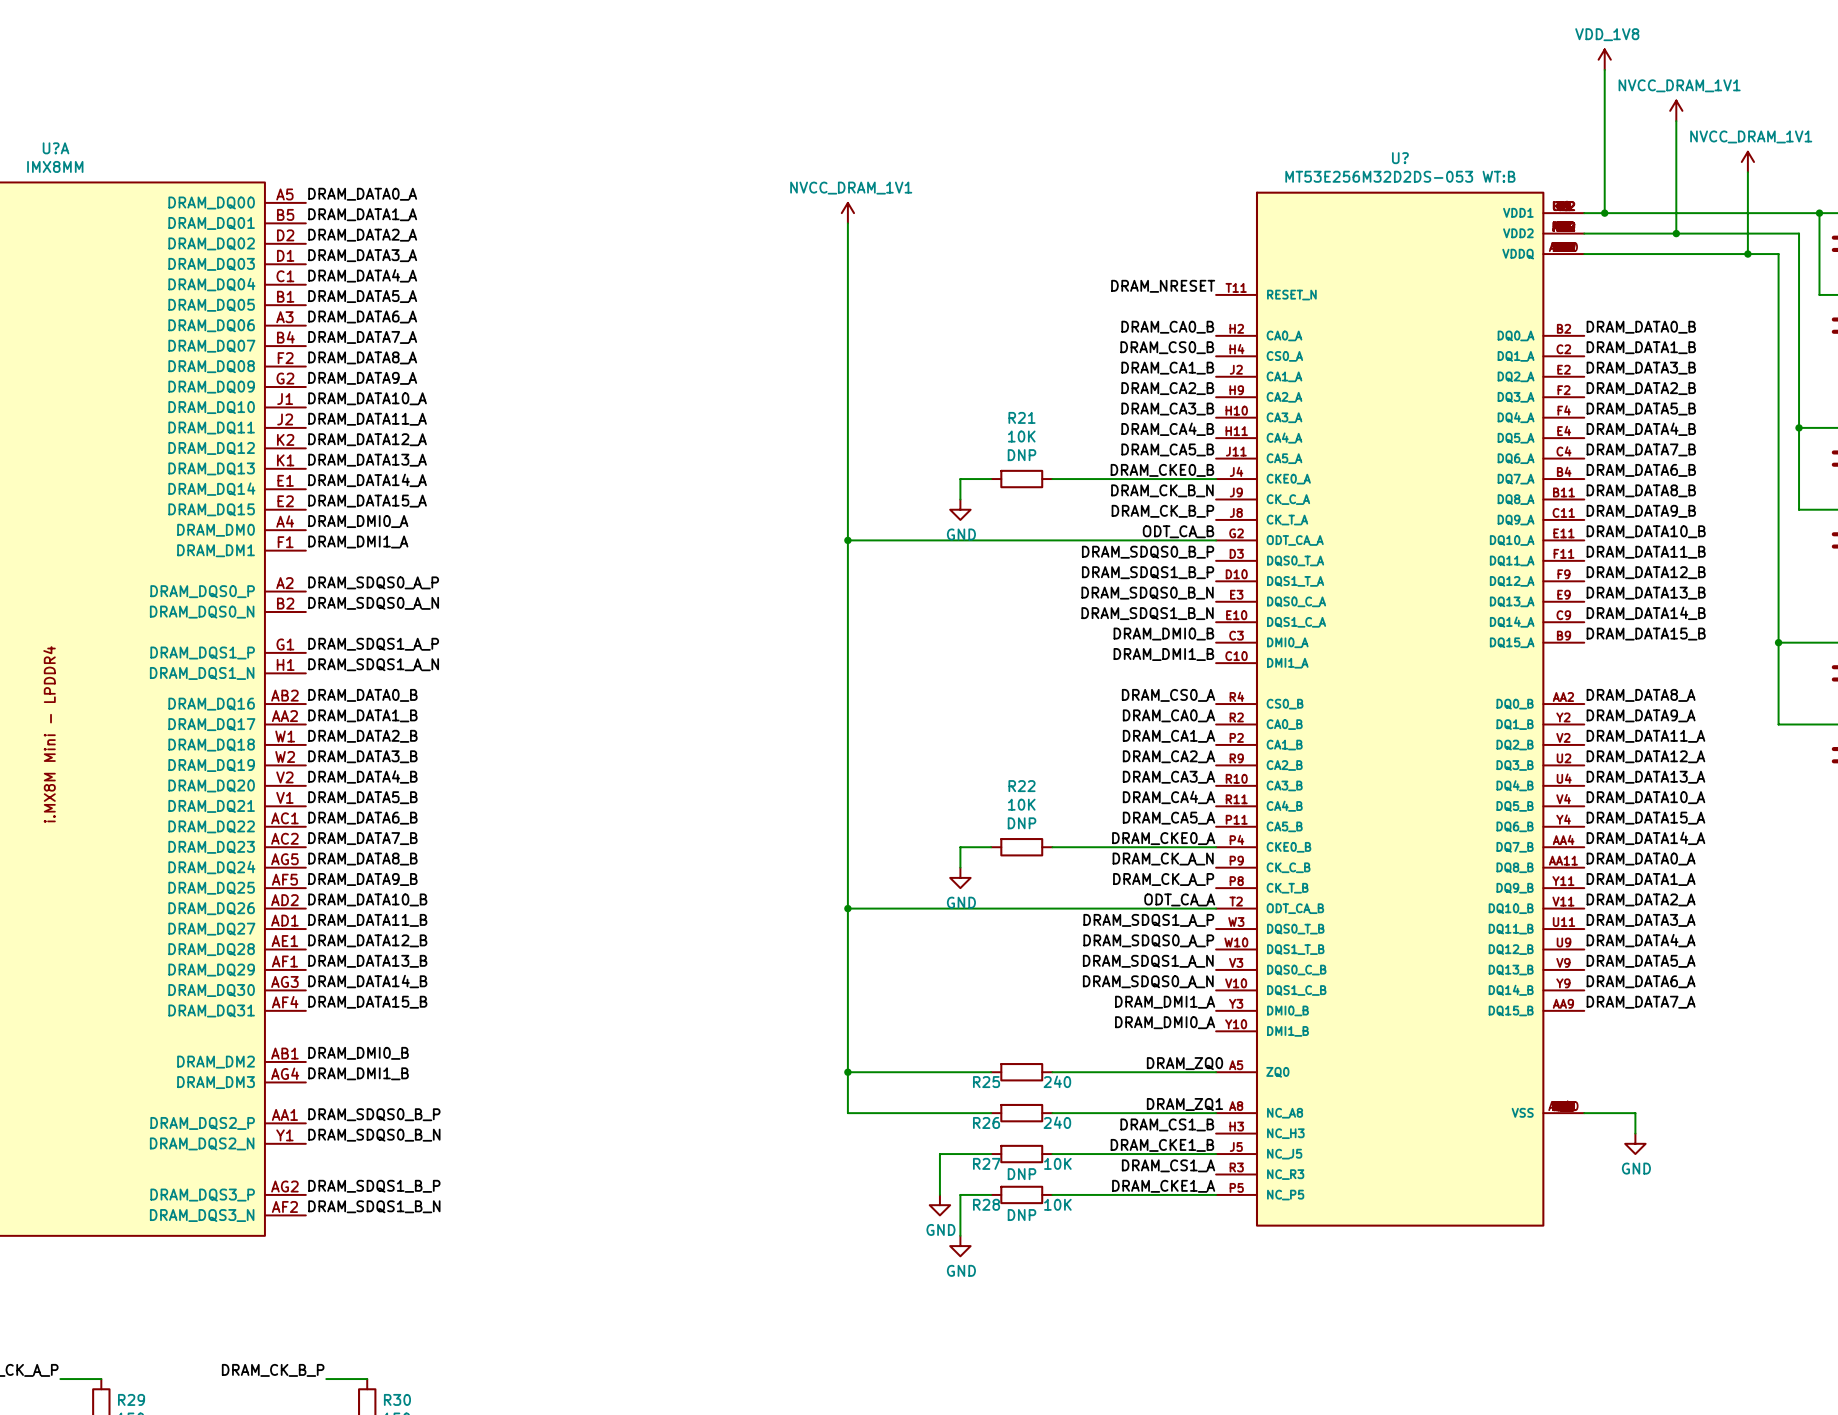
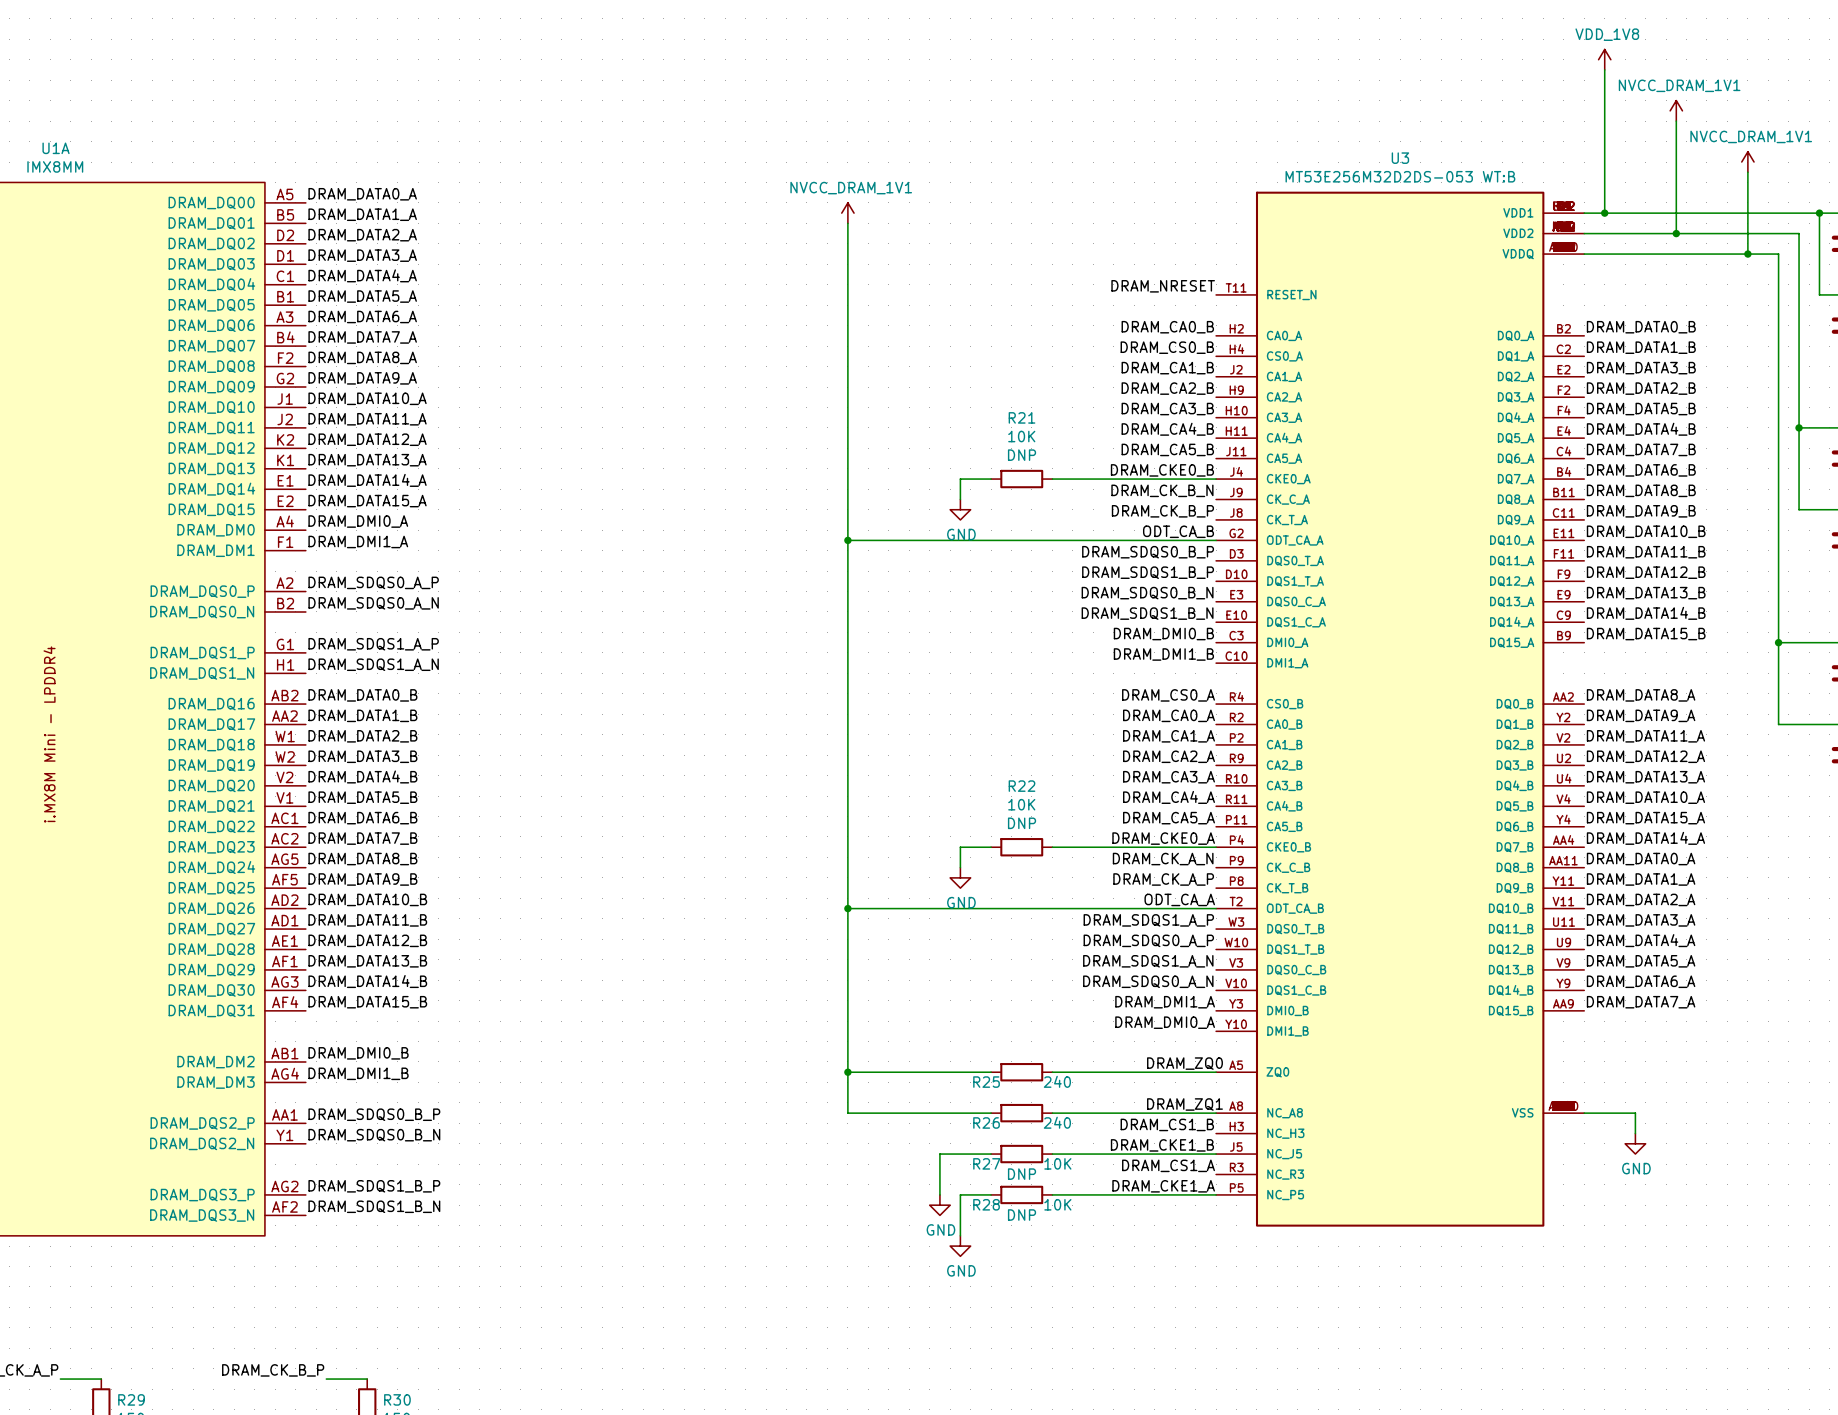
U?A name: U?A (56, 148) -> U1A (56, 148)
U? name: U? (1400, 158) -> U3 (1400, 158)

